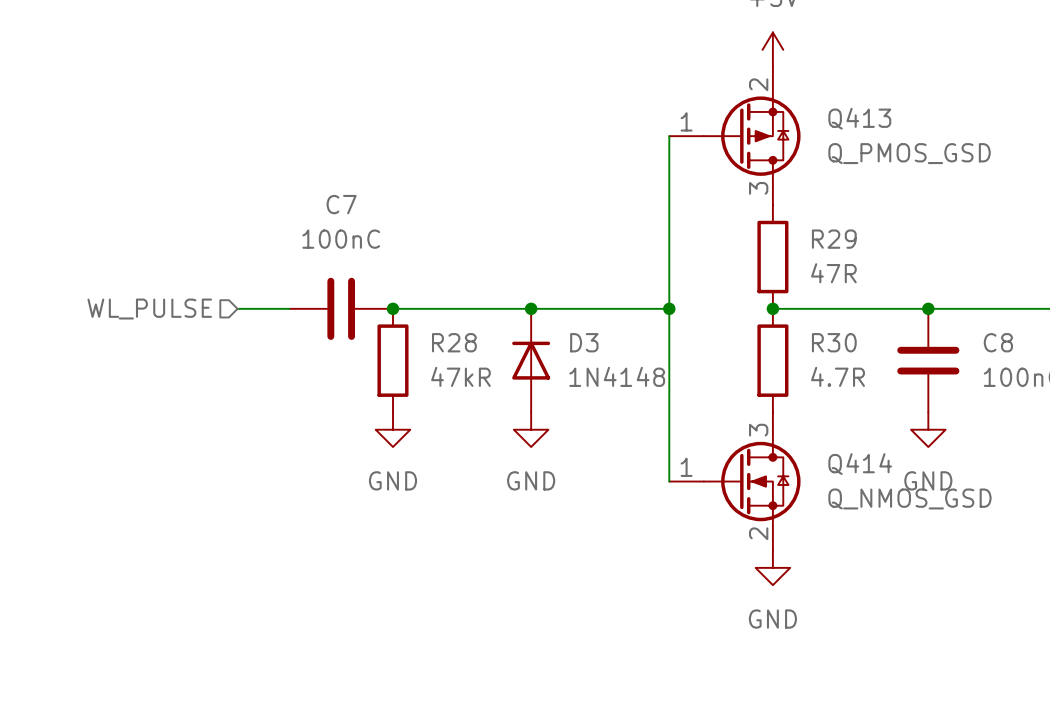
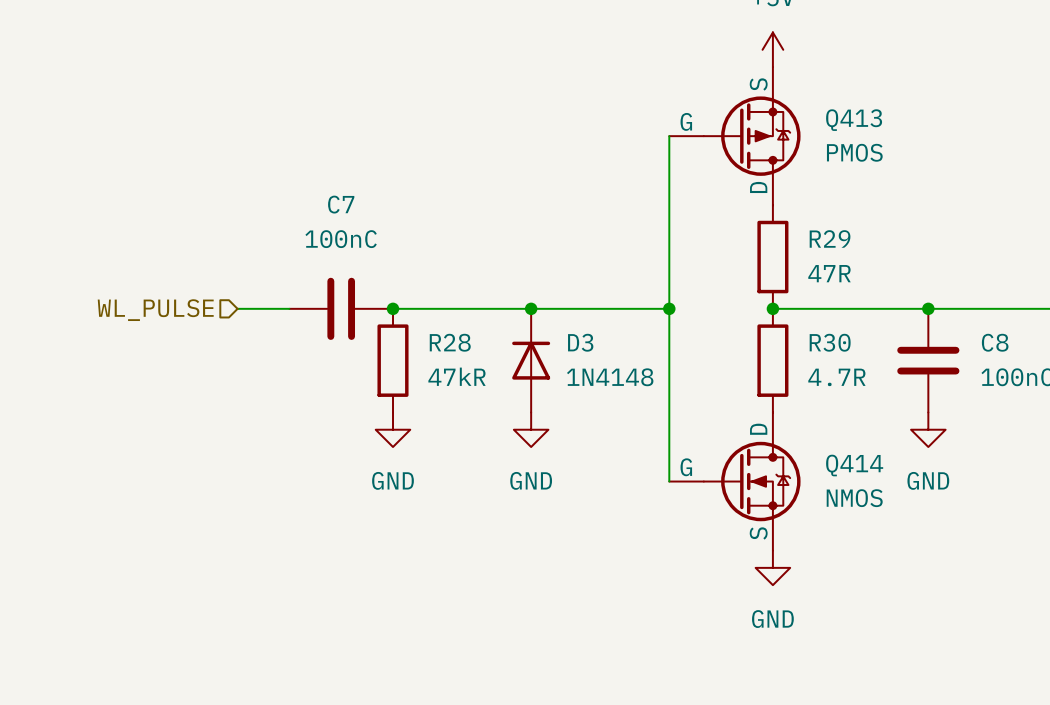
Q413 symbol: [669, 67, 801, 206] -> [669, 67, 801, 206]
Q413 value: Q_PMOS_GSD (909, 153) -> PMOS (854, 152)
Q414 symbol: [669, 412, 801, 551] -> [669, 412, 801, 551]
Q414 value: Q_NMOS_GSD (909, 498) -> NMOS (854, 498)

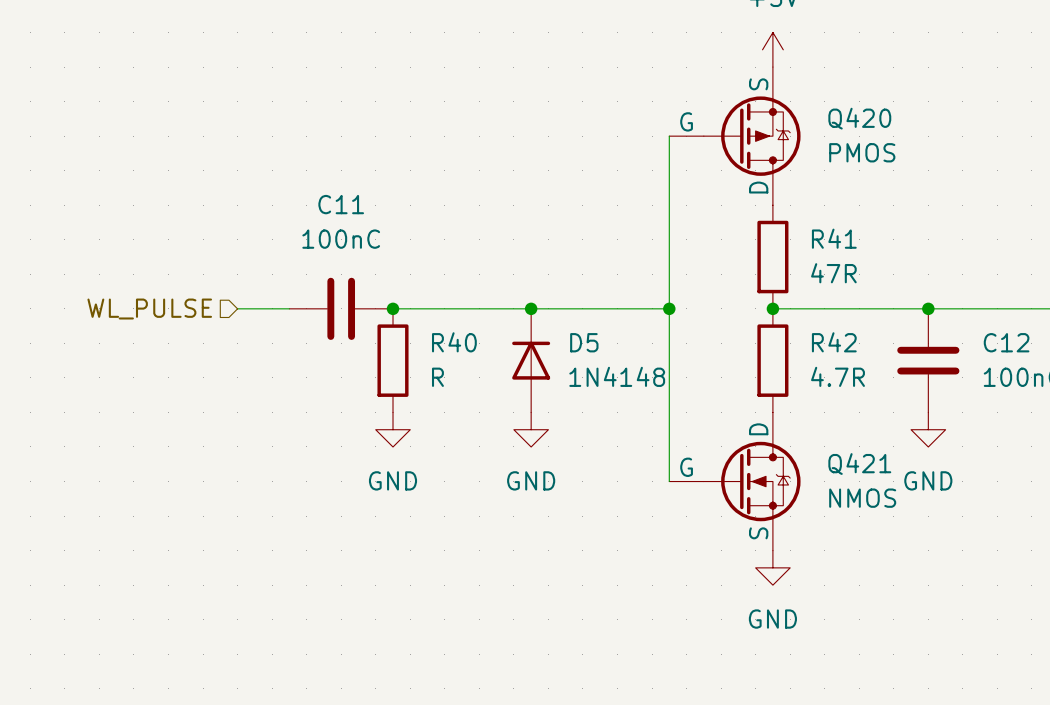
Q413 name: Q413 (854, 120) -> Q420 (859, 118)
C7 name: C7 (341, 204) -> C11 (341, 204)
R29 name: R29 (830, 238) -> R41 (834, 238)
R28 name: R28 (450, 342) -> R40 (454, 342)
D3 name: D3 (580, 342) -> D5 (584, 342)
R30 name: R30 (830, 342) -> R42 (834, 342)
C8 name: C8 (995, 342) -> C12 (1006, 342)
R28 value: 47kR (457, 376) -> R (437, 377)
Q414 name: Q414 (854, 465) -> Q421 (859, 464)

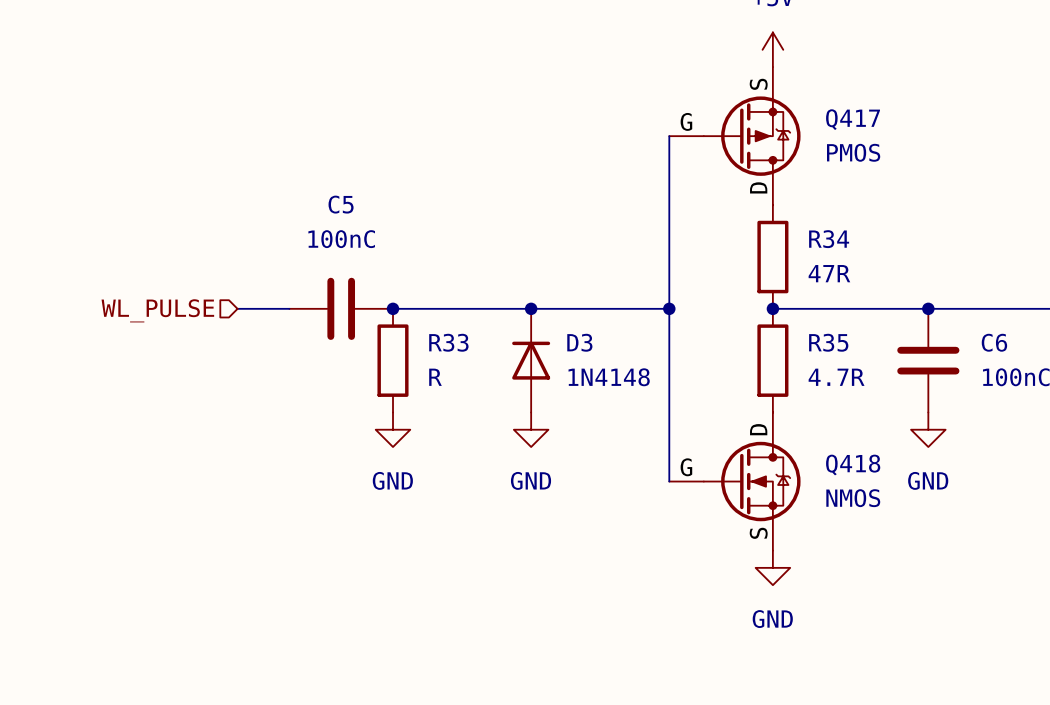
Q420 name: Q420 (859, 118) -> Q417 (853, 119)
C11 name: C11 (341, 204) -> C5 (341, 204)
R41 name: R41 (834, 238) -> R34 (829, 239)
R40 name: R40 (454, 342) -> R33 (448, 342)
D5 name: D5 (584, 342) -> D3 (579, 342)
R42 name: R42 (834, 342) -> R35 (828, 342)
C12 name: C12 (1006, 342) -> C6 (994, 342)
Q421 name: Q421 (859, 464) -> Q418 (853, 465)

